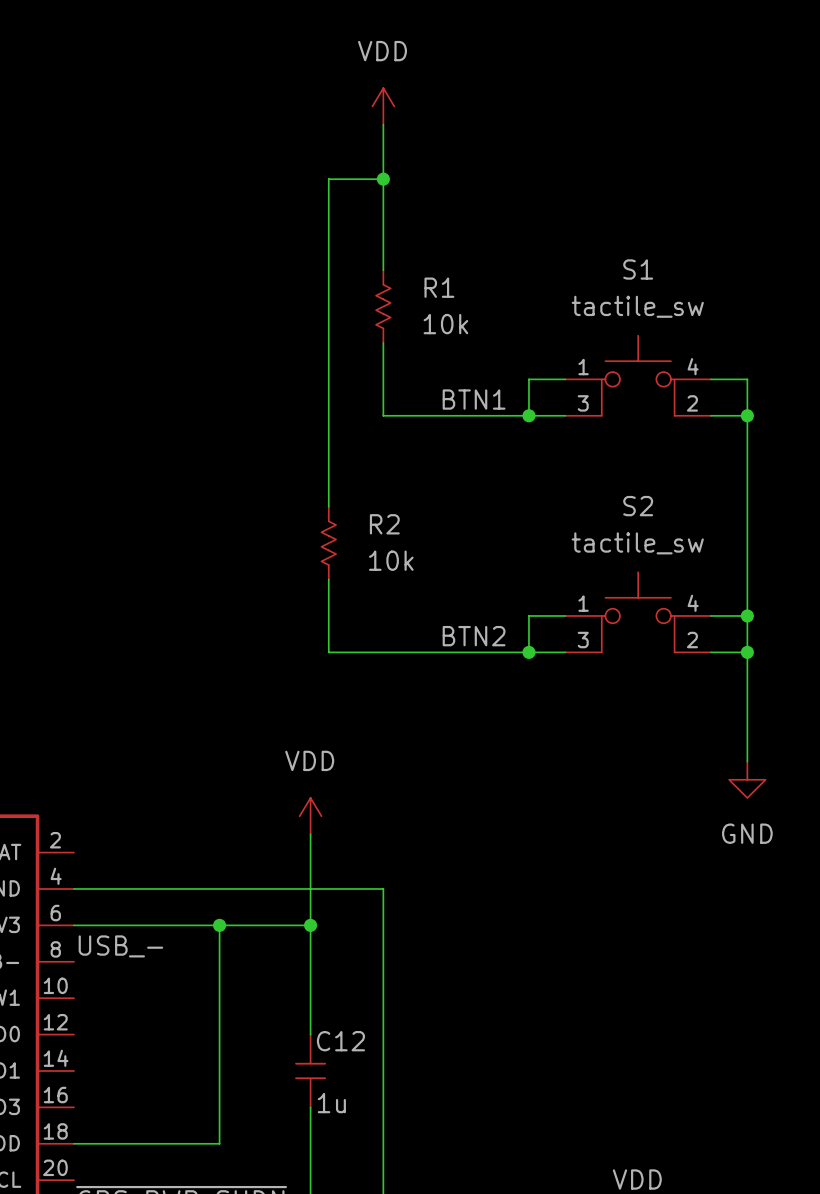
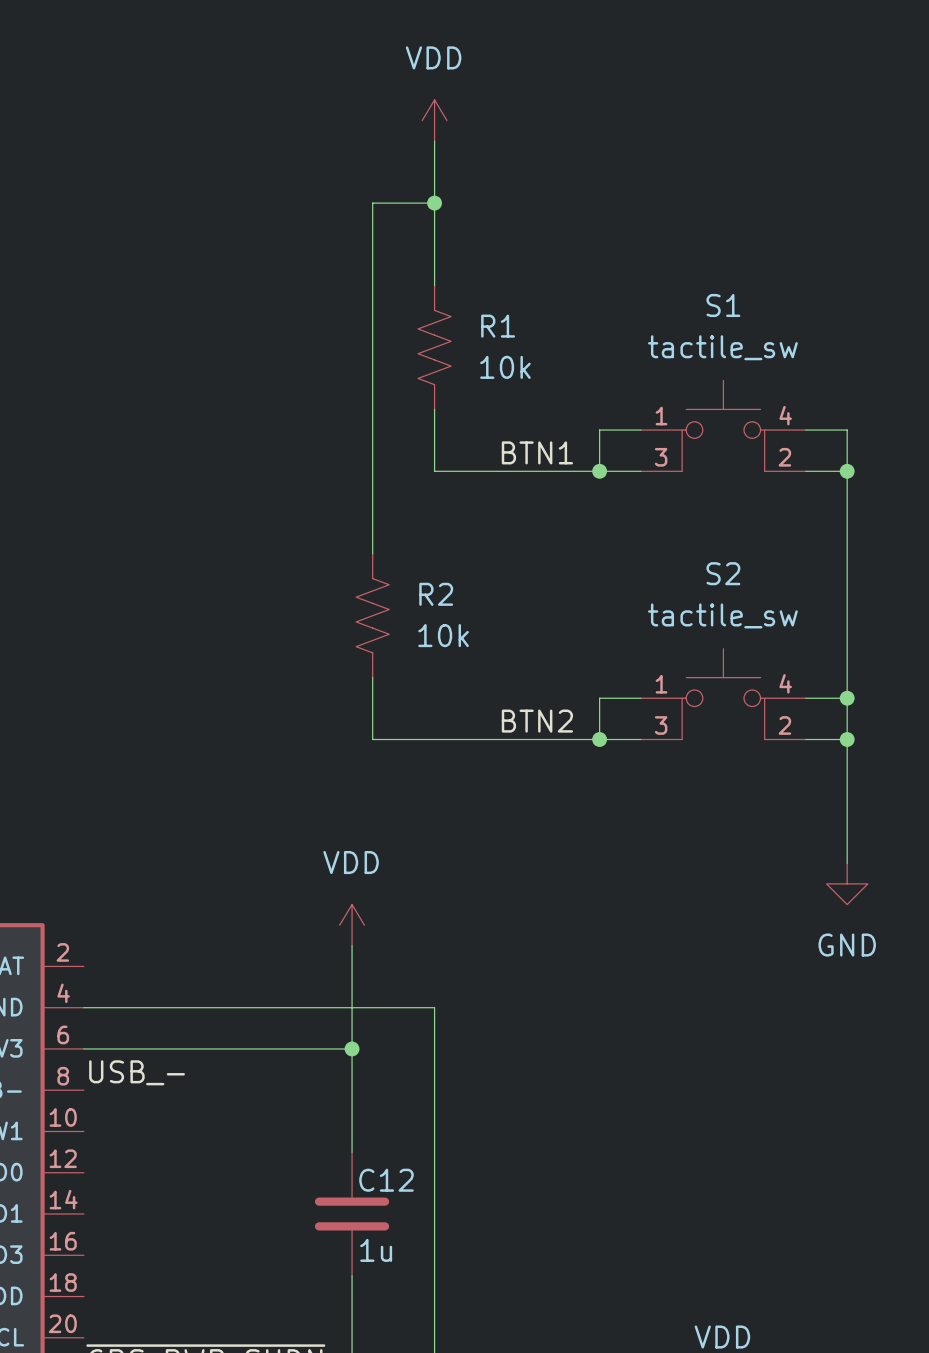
R1 symbol: [376, 270, 391, 343] -> [418, 285, 452, 410]
R2 symbol: [321, 506, 337, 580] -> [356, 553, 390, 678]
wire: (219, 925) (219, 1143) (73, 1143) -> none
junction: (219, 925) -> none
C12 symbol: [295, 1034, 327, 1108] -> [314, 1152, 390, 1276]

